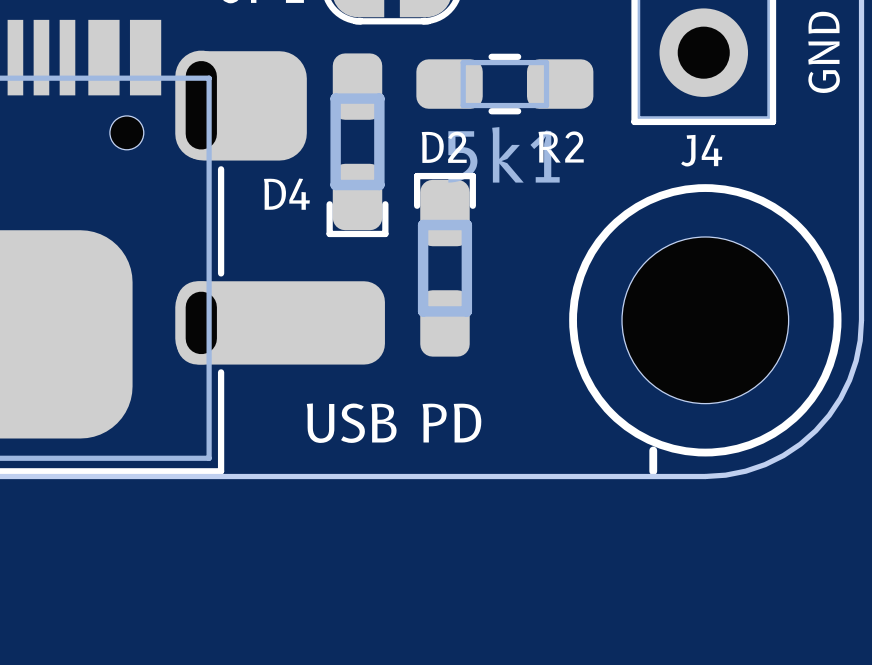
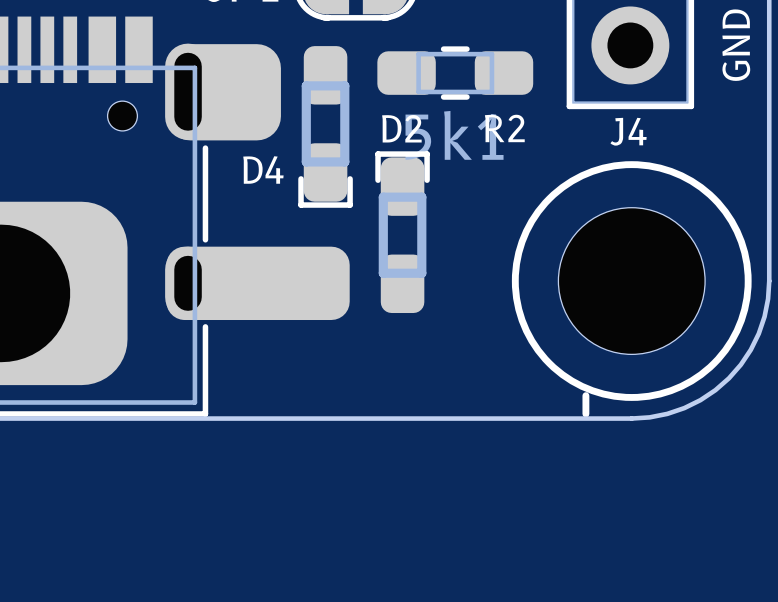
text: USB PD (394, 423) -> none

